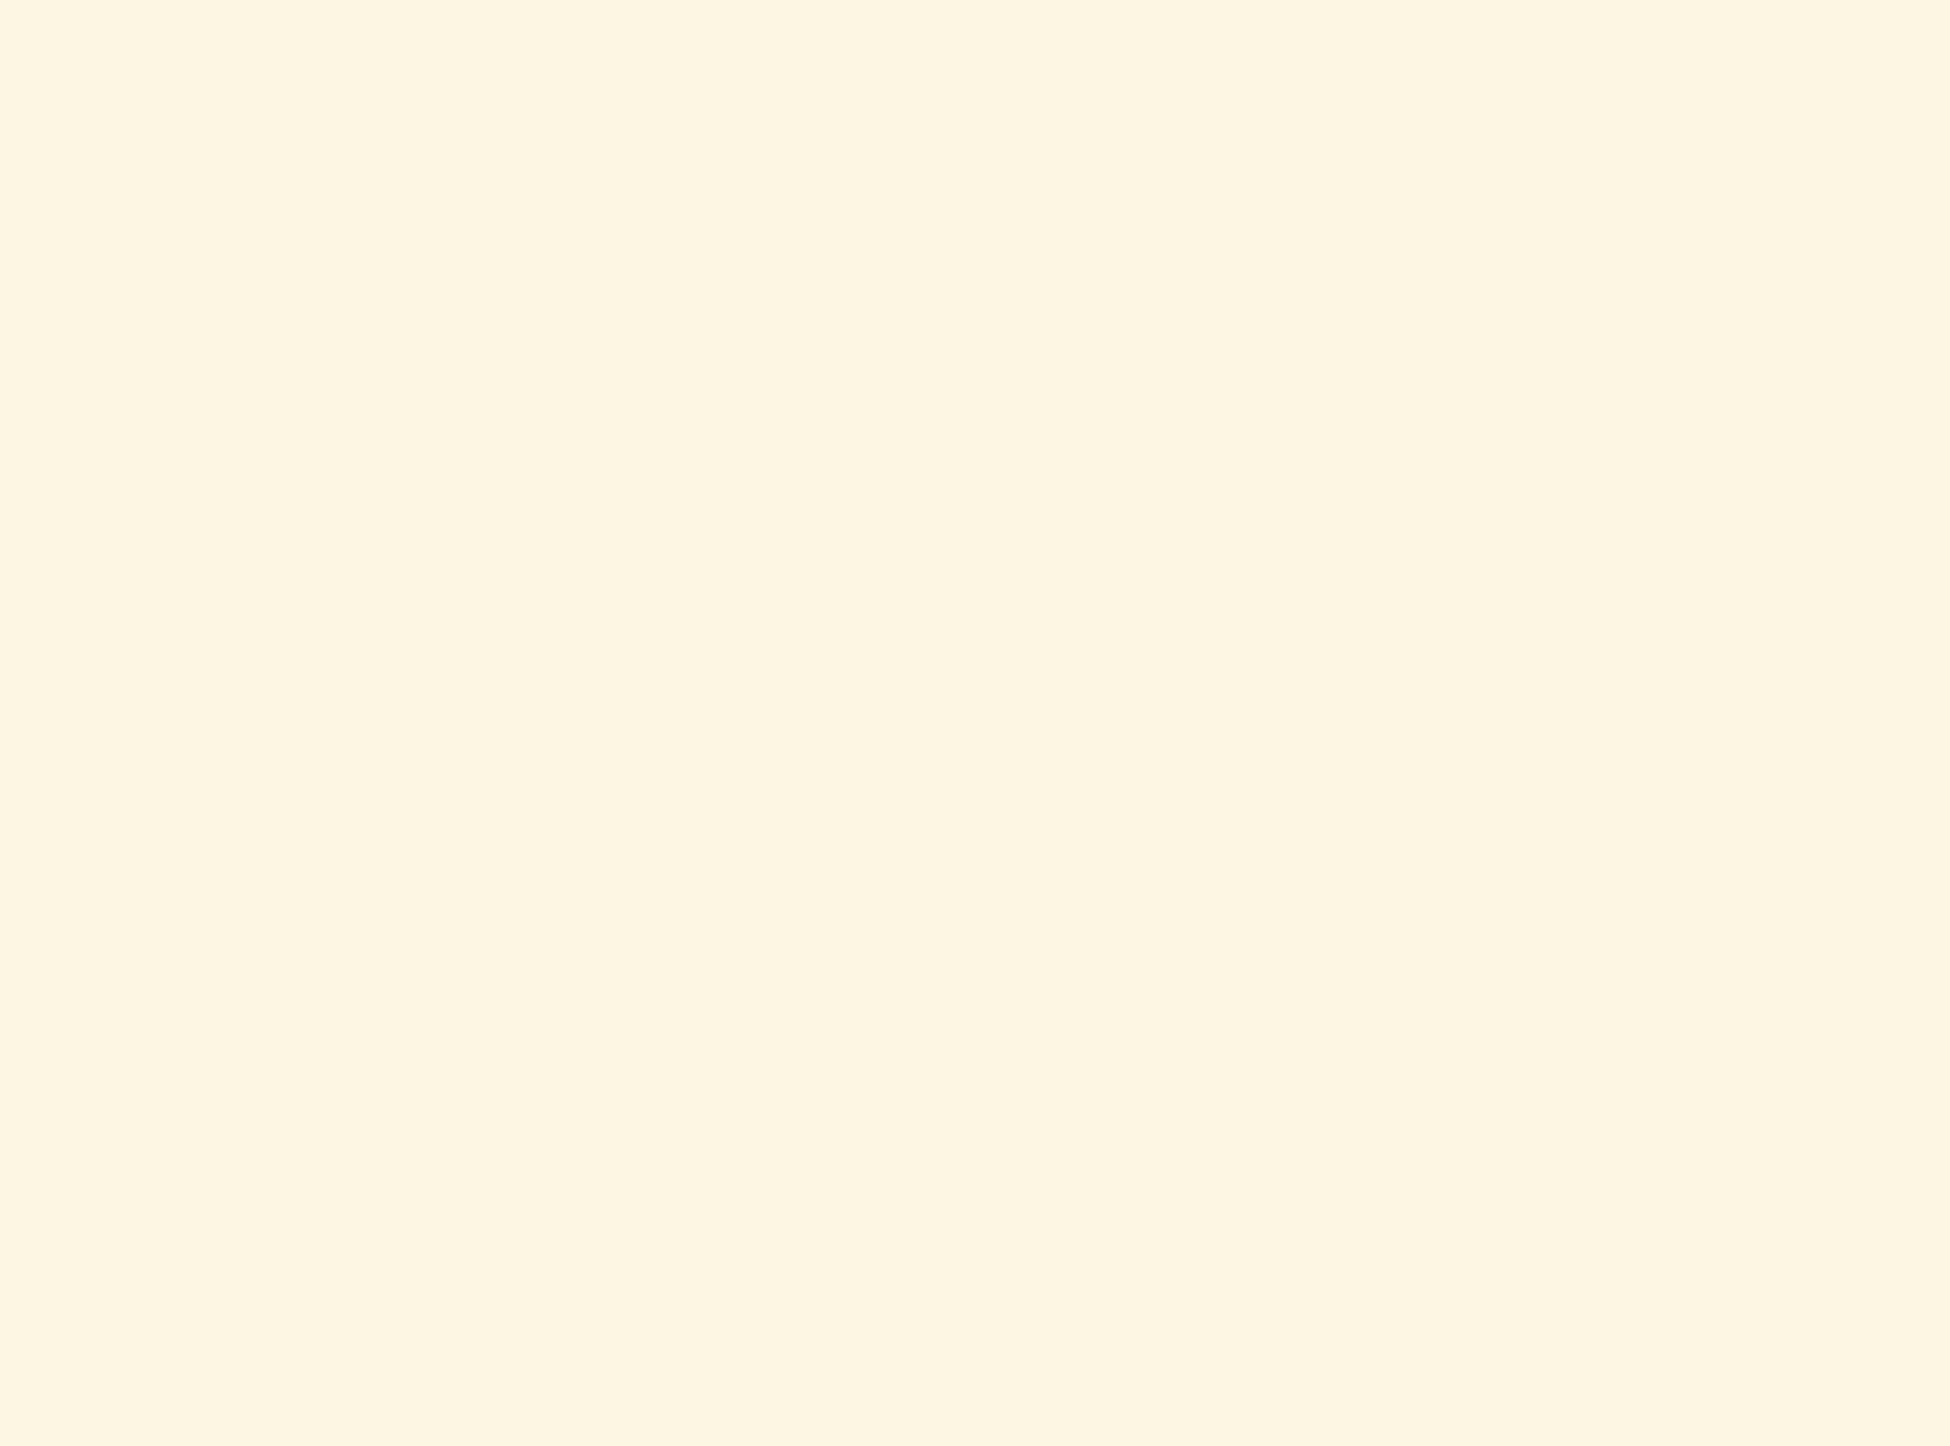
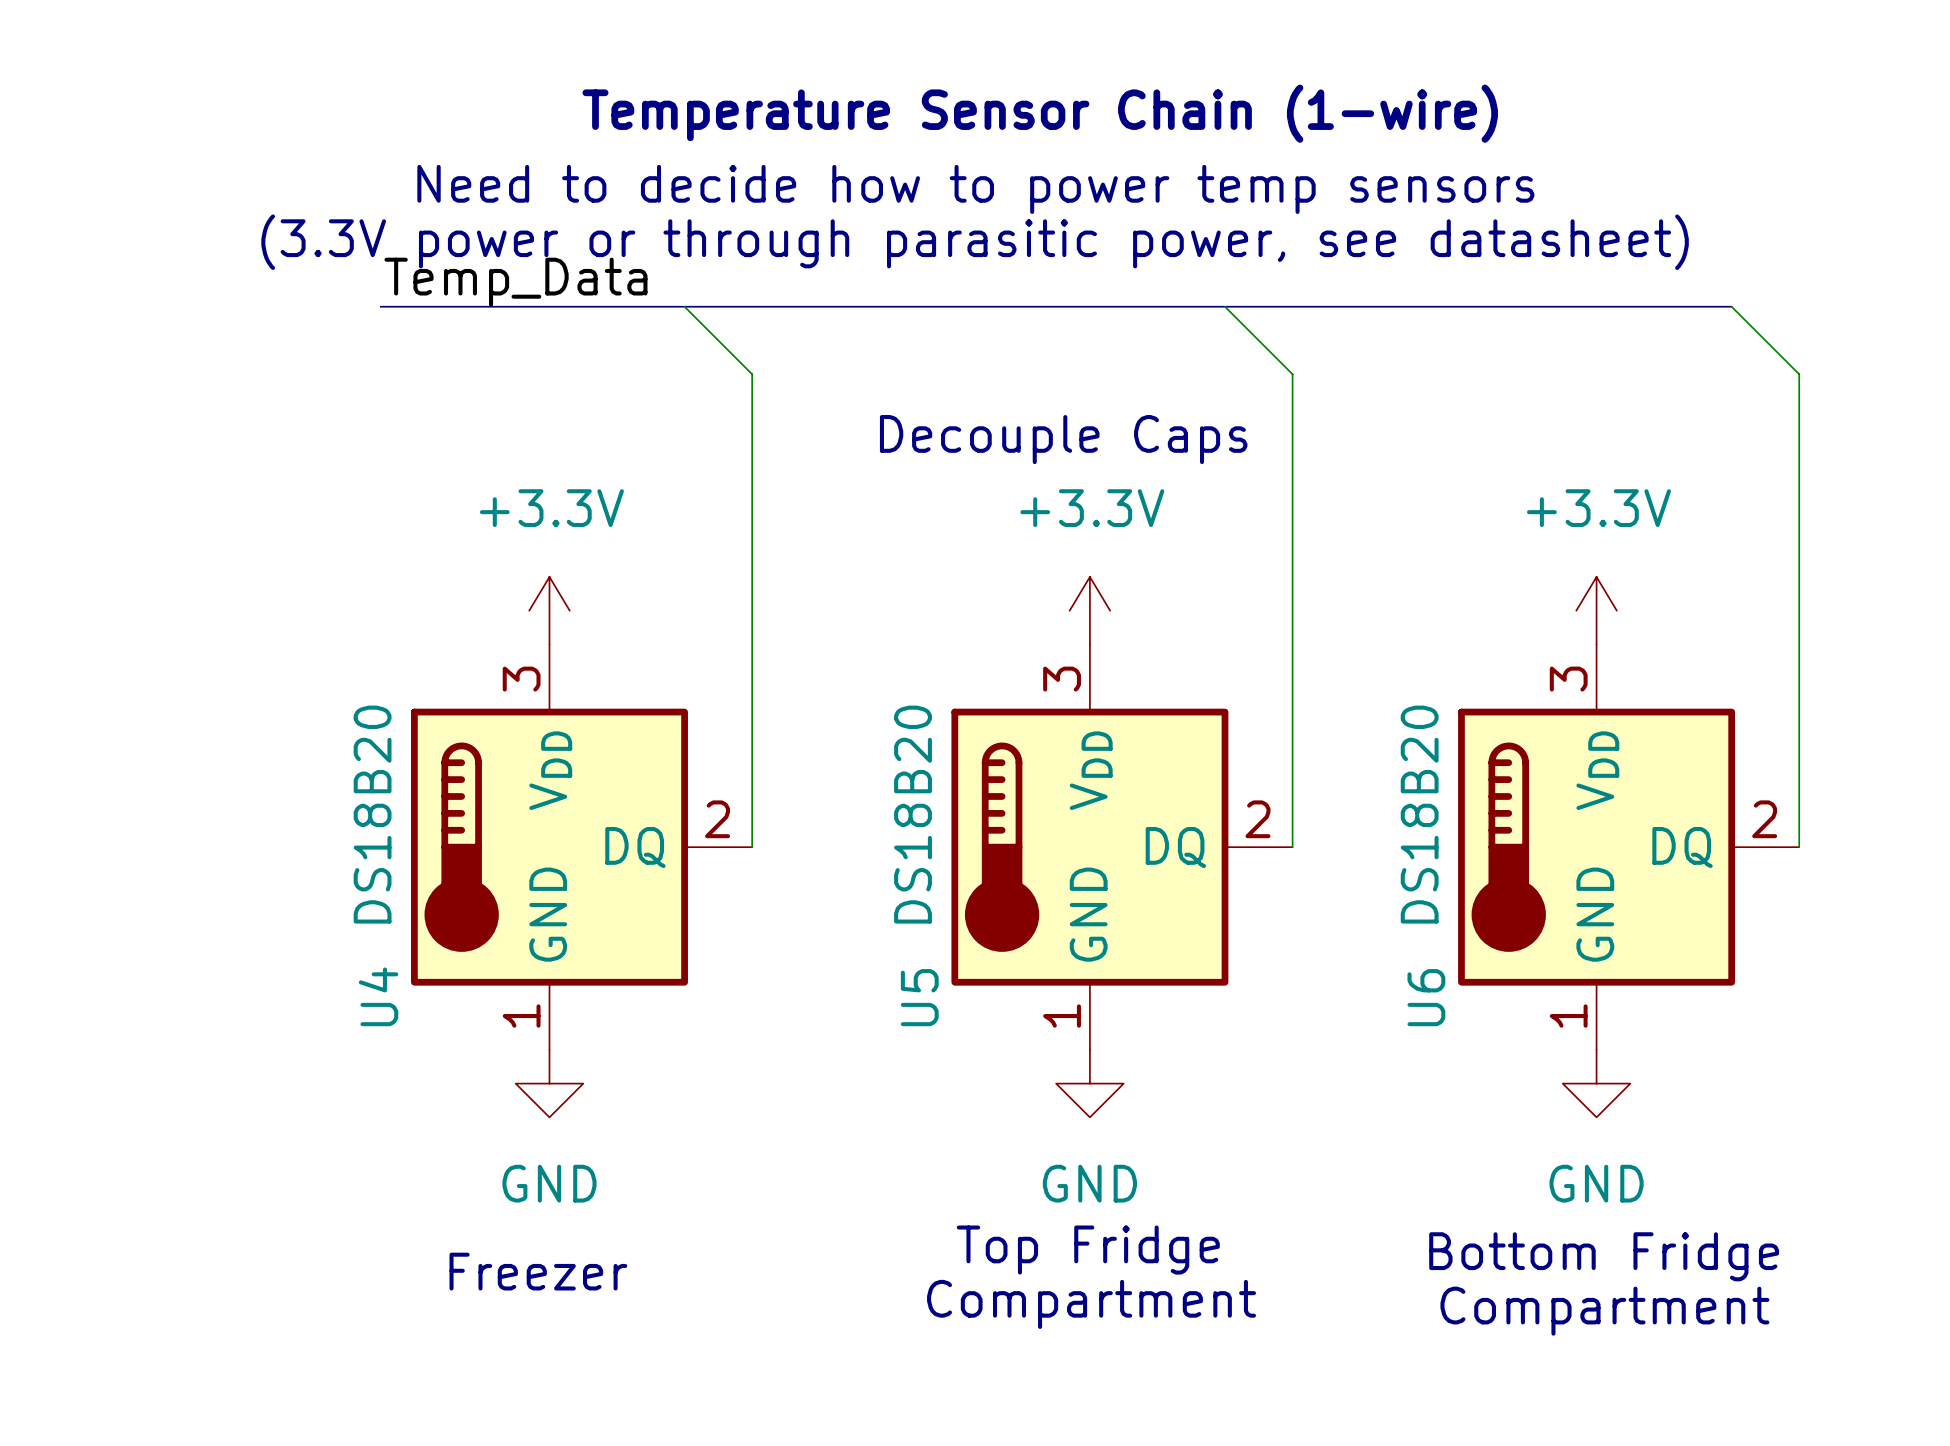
text: none -> Temperature Sensor Chain (1-wire) (1040, 113)
text: none -> Need to decide how to power temp sensors (975, 189)
text: none -> (3.3V power or through parasitic power, see datasheet) (975, 242)
label: none -> Temp_Data (515, 282)
bus: none -> (380, 306) (1731, 306)
wire: none -> (684, 306) (752, 374) (752, 847)
wire: none -> (1225, 306) (1292, 374) (1292, 847)
wire: none -> (1731, 306) (1799, 374) (1799, 847)
text: none -> Decouple Caps (1063, 439)
power symbol: none -> +3.3V (549, 610)
power symbol: none -> +3.3V (1089, 610)
power symbol: none -> +3.3V (1596, 610)
U4: none -> DS18B20 (581, 847)
U5: none -> DS18B20 (1122, 847)
U6: none -> DS18B20 (1628, 847)
power symbol: none -> GND (549, 1083)
power symbol: none -> GND (1089, 1083)
power symbol: none -> GND (1596, 1083)
text: none -> Top Fridge (1088, 1250)
text: none -> Bottom Fridge (1604, 1256)
text: none -> Freezer (538, 1271)
text: none -> Compartment (1091, 1304)
text: none -> Compartment (1604, 1311)

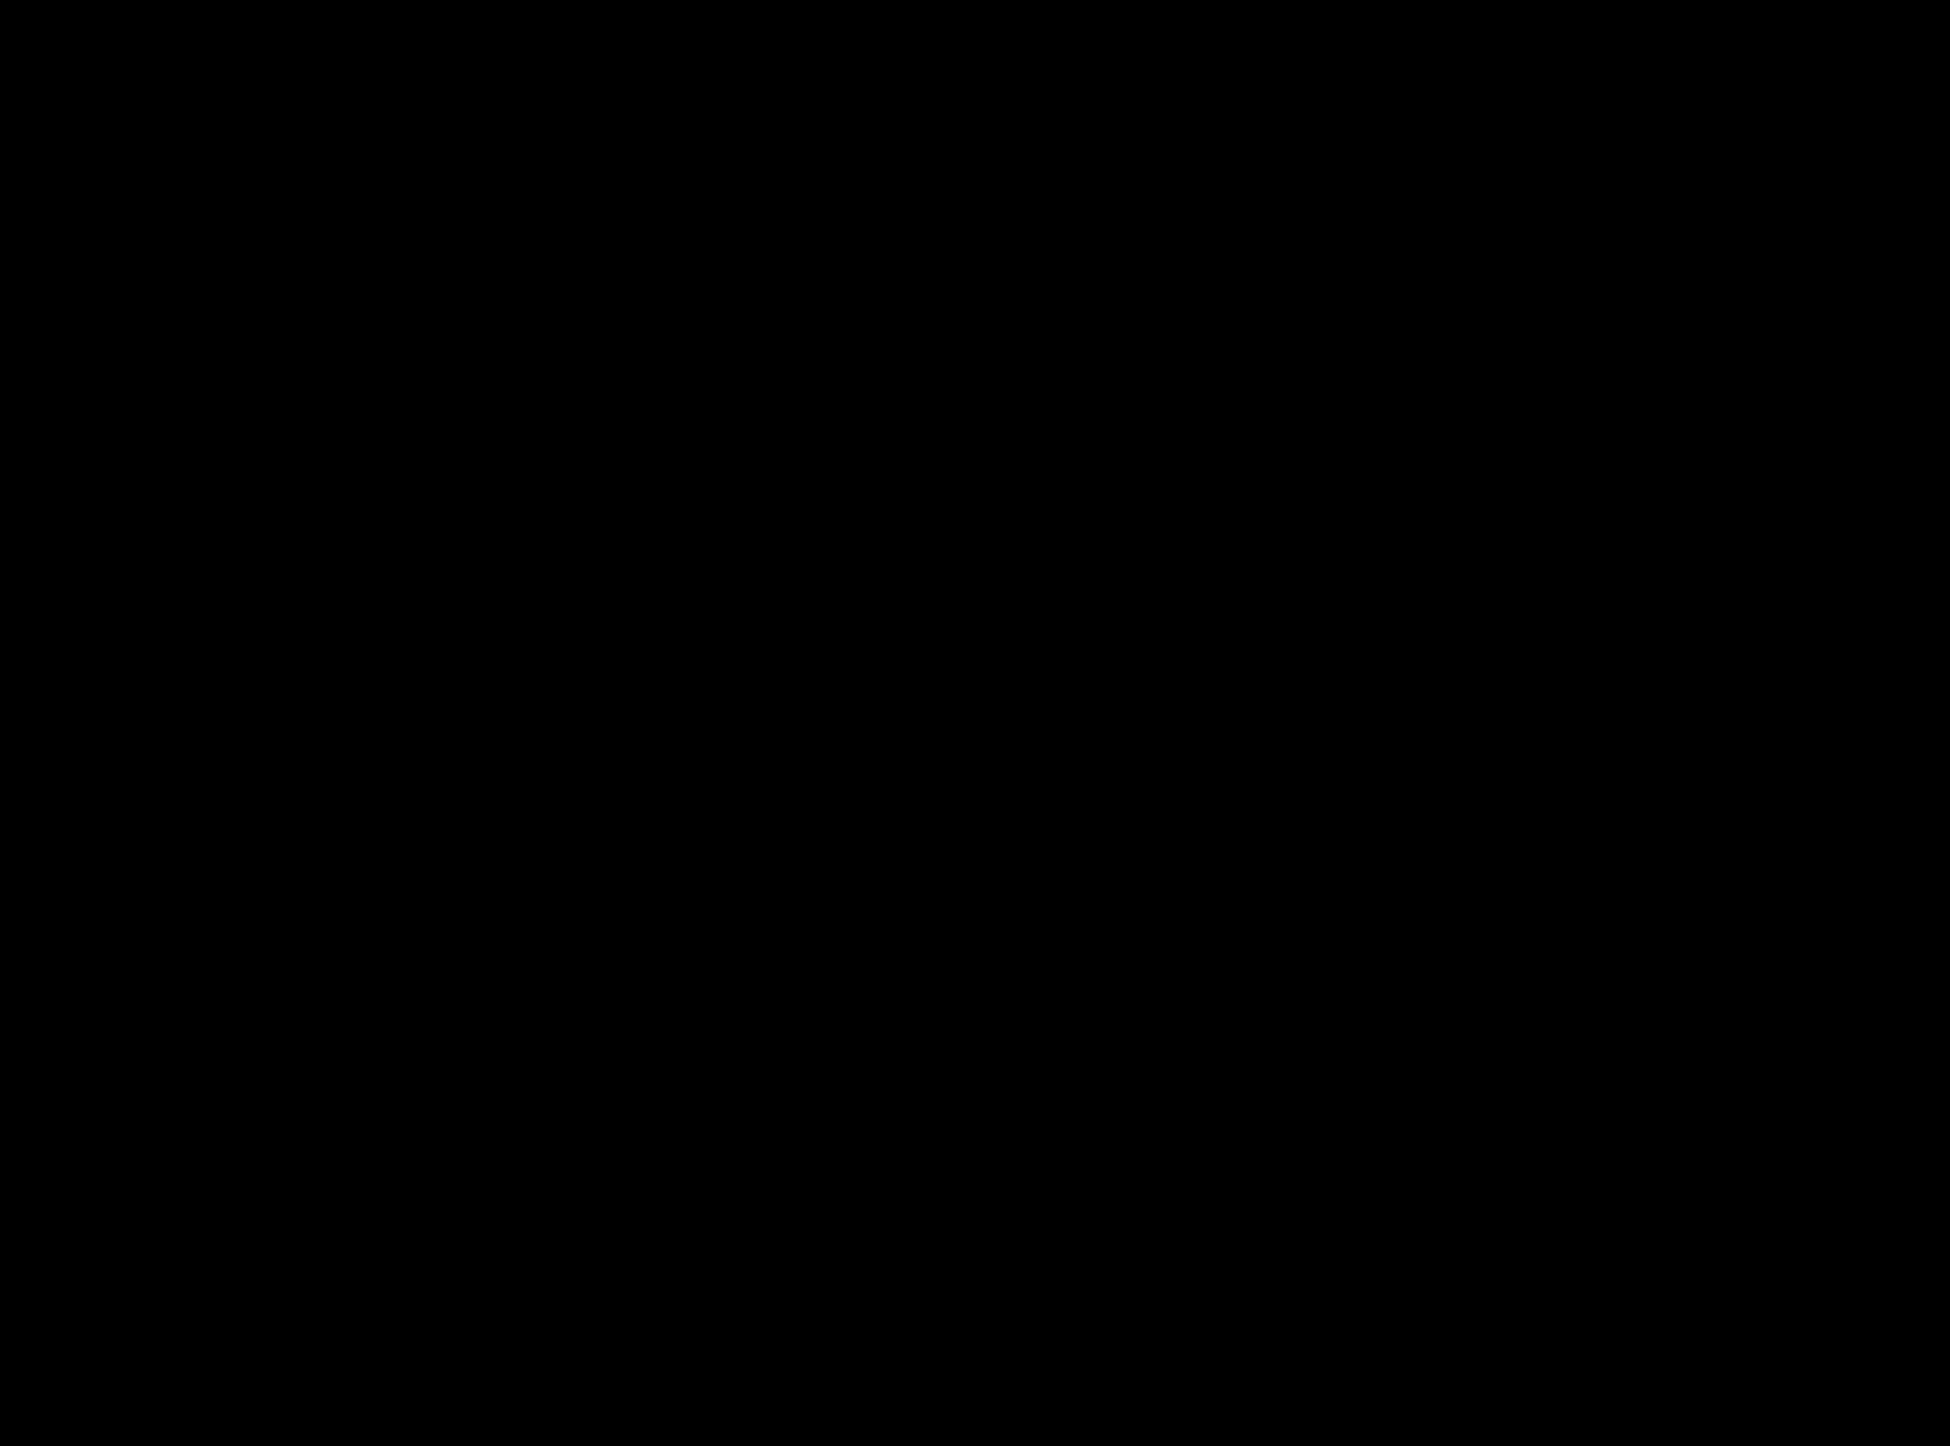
text: Temperature Sensor Chain (1-wire) (1040, 113) -> none
text: Need to decide how to power temp sensors (975, 189) -> none
text: (3.3V power or through parasitic power, see datasheet) (975, 242) -> none
label: Temp_Data (515, 282) -> none
bus: (380, 306) (1731, 306) -> none
wire: (684, 306) (752, 374) (752, 847) -> none
wire: (1225, 306) (1292, 374) (1292, 847) -> none
wire: (1731, 306) (1799, 374) (1799, 847) -> none
text: Decouple Caps (1063, 439) -> none
power symbol: +3.3V (549, 610) -> none
power symbol: +3.3V (1089, 610) -> none
power symbol: +3.3V (1596, 610) -> none
U4: DS18B20 (581, 847) -> none
U5: DS18B20 (1122, 847) -> none
U6: DS18B20 (1628, 847) -> none
power symbol: GND (549, 1083) -> none
power symbol: GND (1089, 1083) -> none
power symbol: GND (1596, 1083) -> none
text: Top Fridge (1088, 1250) -> none
text: Bottom Fridge (1604, 1256) -> none
text: Freezer (538, 1271) -> none
text: Compartment (1091, 1304) -> none
text: Compartment (1604, 1311) -> none

